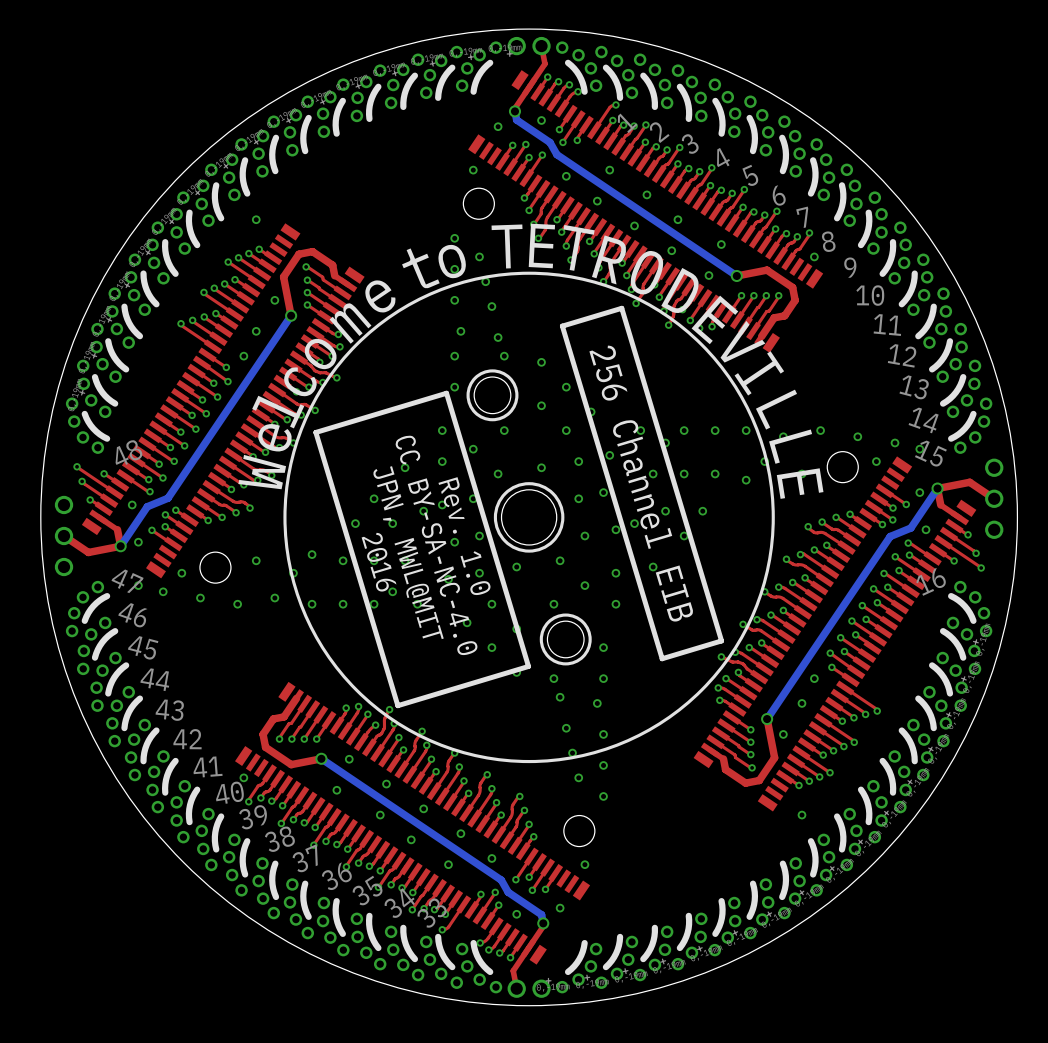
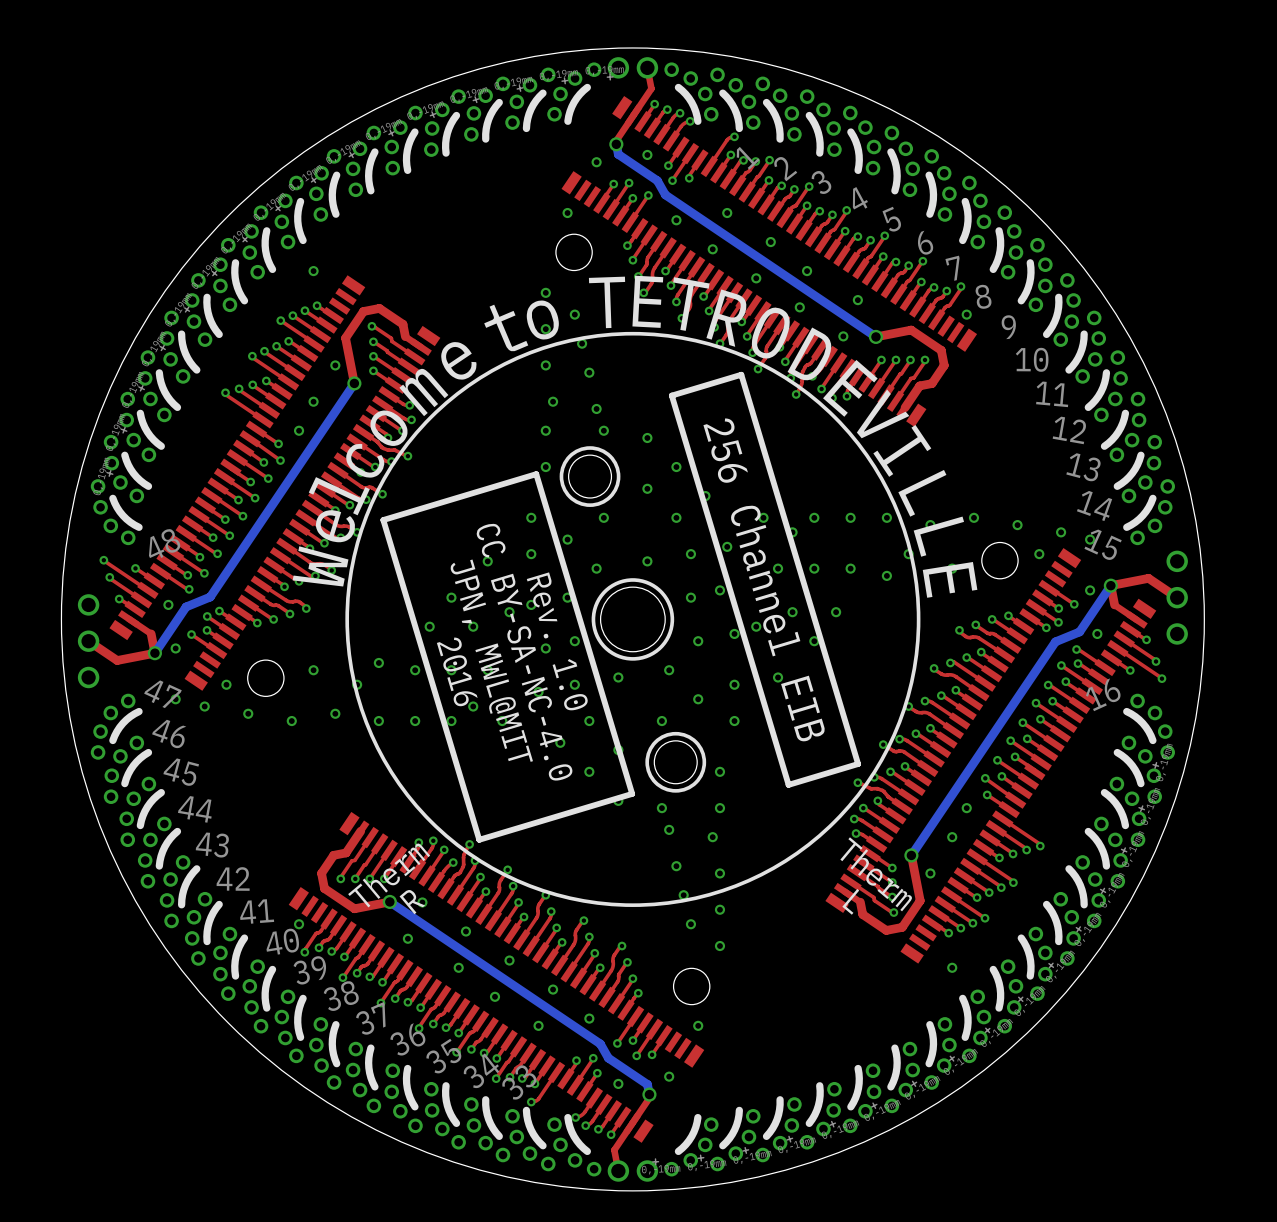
text: none -> Therm (389, 875)
text: none -> Therm (876, 874)
text: none -> R (412, 901)
text: none -> L (850, 901)

